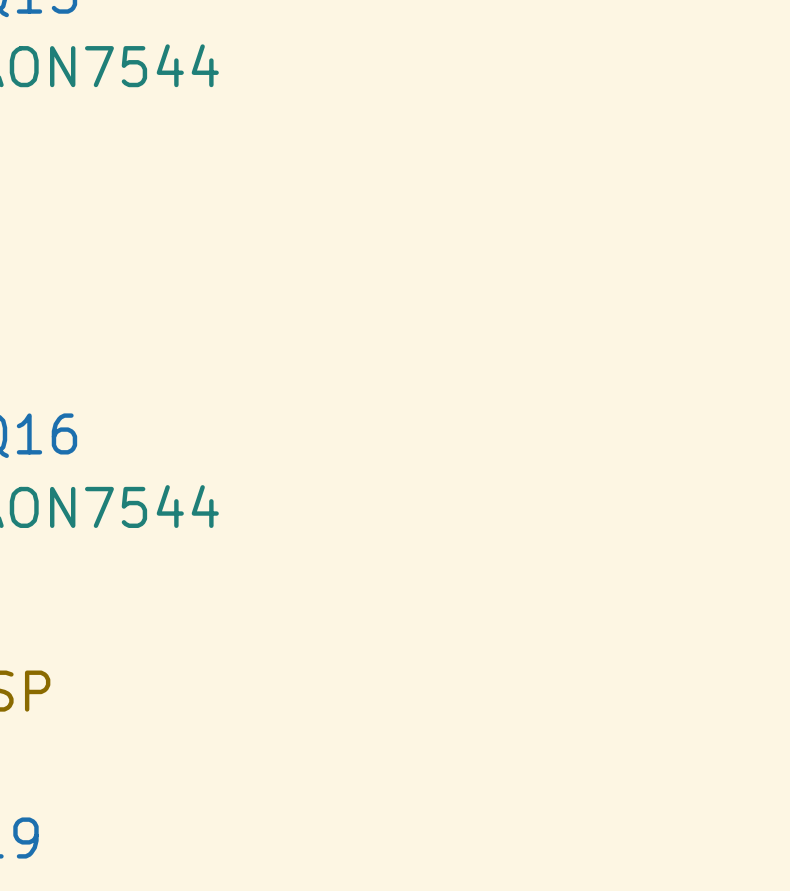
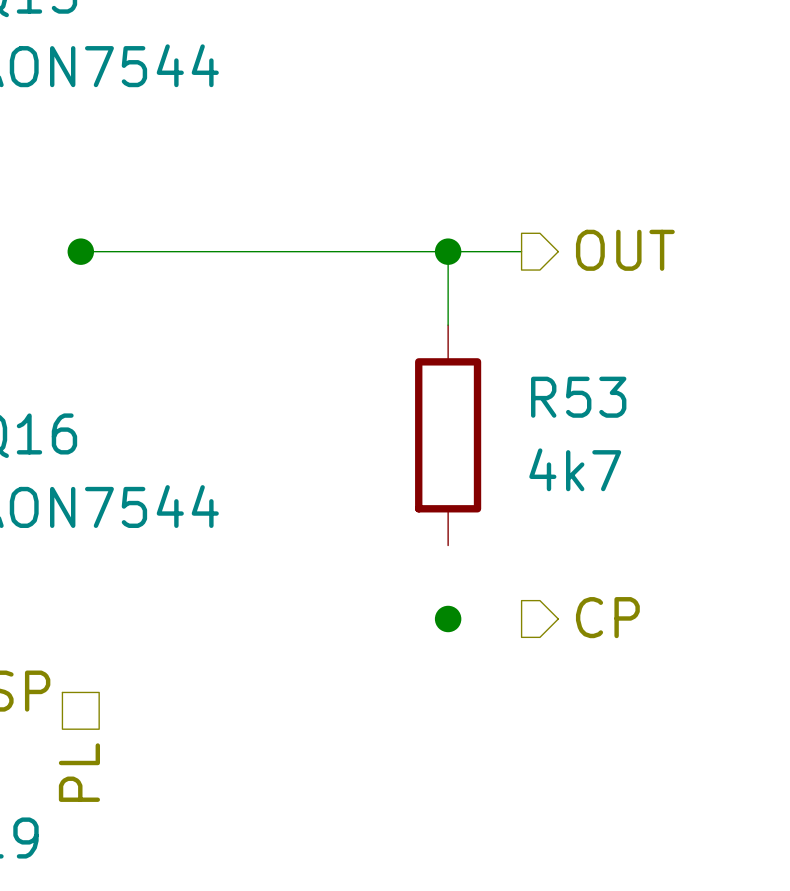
hierarchical label: none -> OUT (625, 250)
wire: none -> (80, 251) (521, 251)
junction: none -> (80, 251)
wire: none -> (448, 251) (448, 325)
junction: none -> (448, 251)
R53: none -> 4k7 (448, 435)
hierarchical label: none -> CP (607, 617)
junction: none -> (448, 618)
hierarchical label: none -> PL (79, 772)

